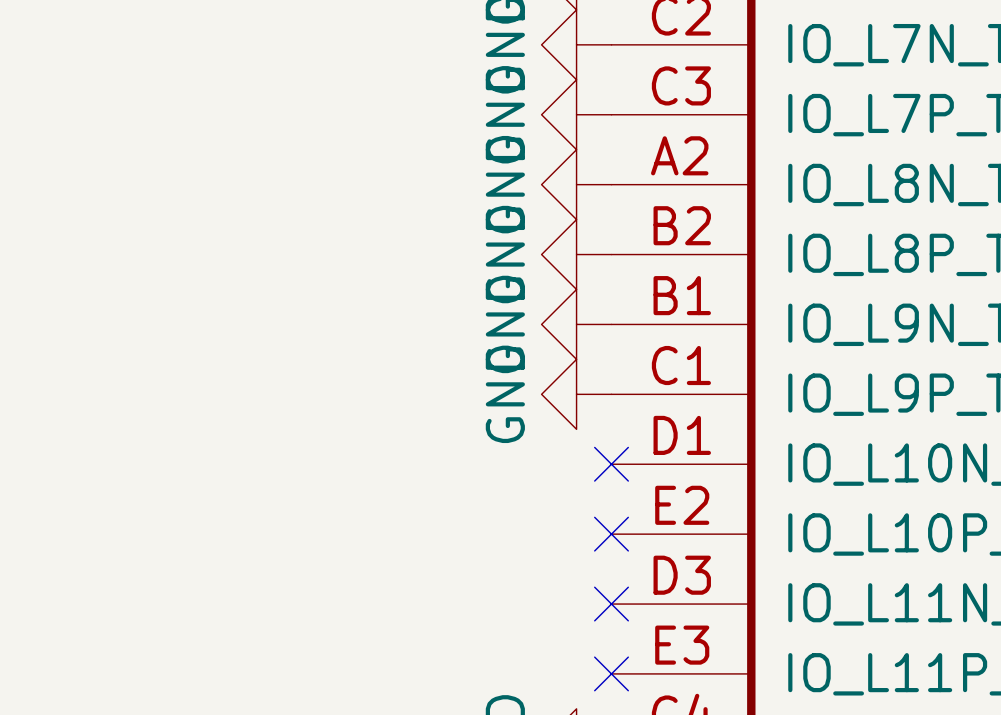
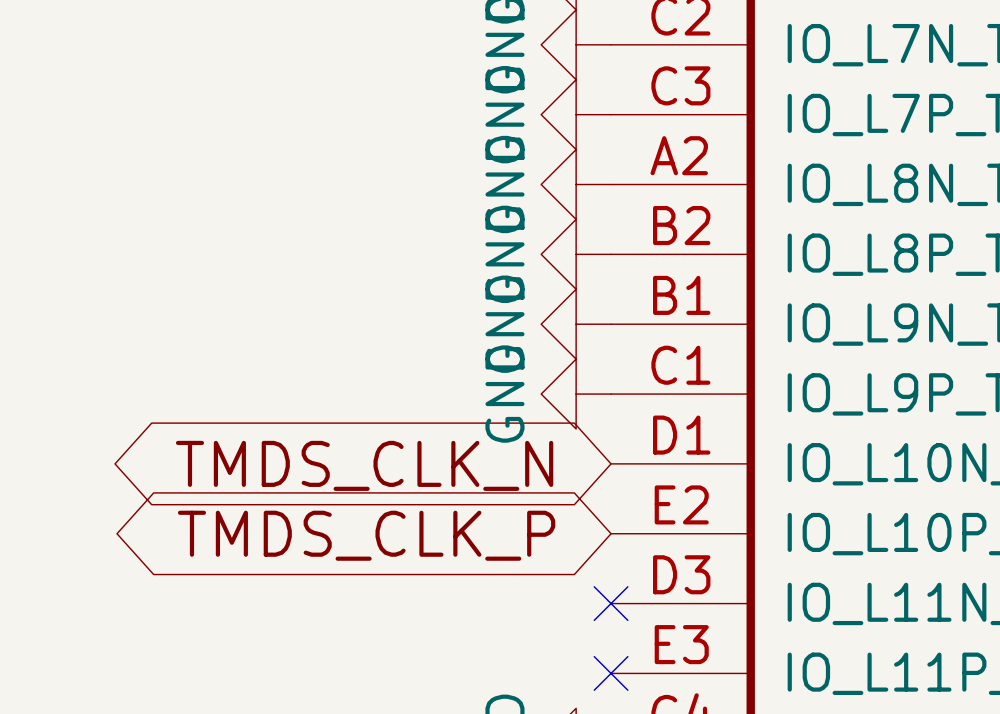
no-connect mark: (611, 464) -> none
global label: none -> TMDS_CLK_N (364, 465)
no-connect mark: (611, 534) -> none
global label: none -> TMDS_CLK_P (366, 535)

